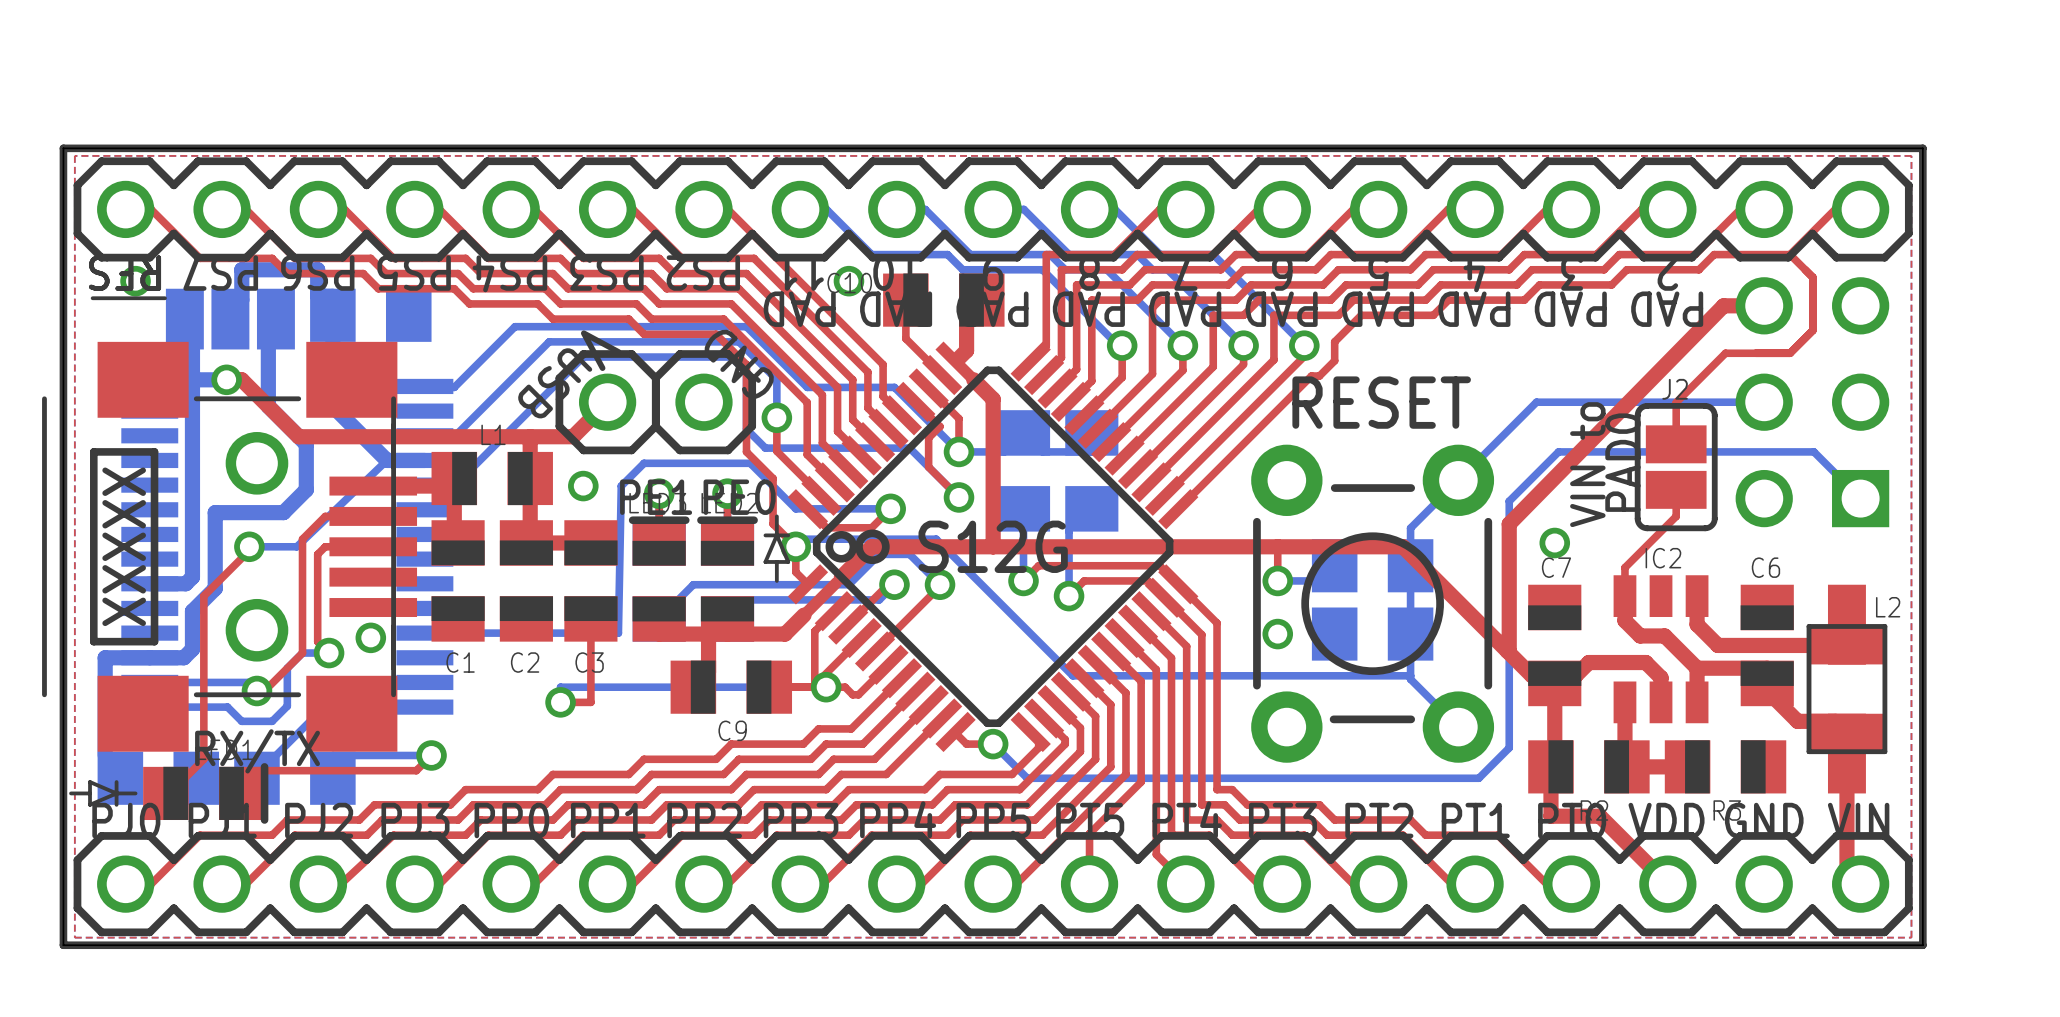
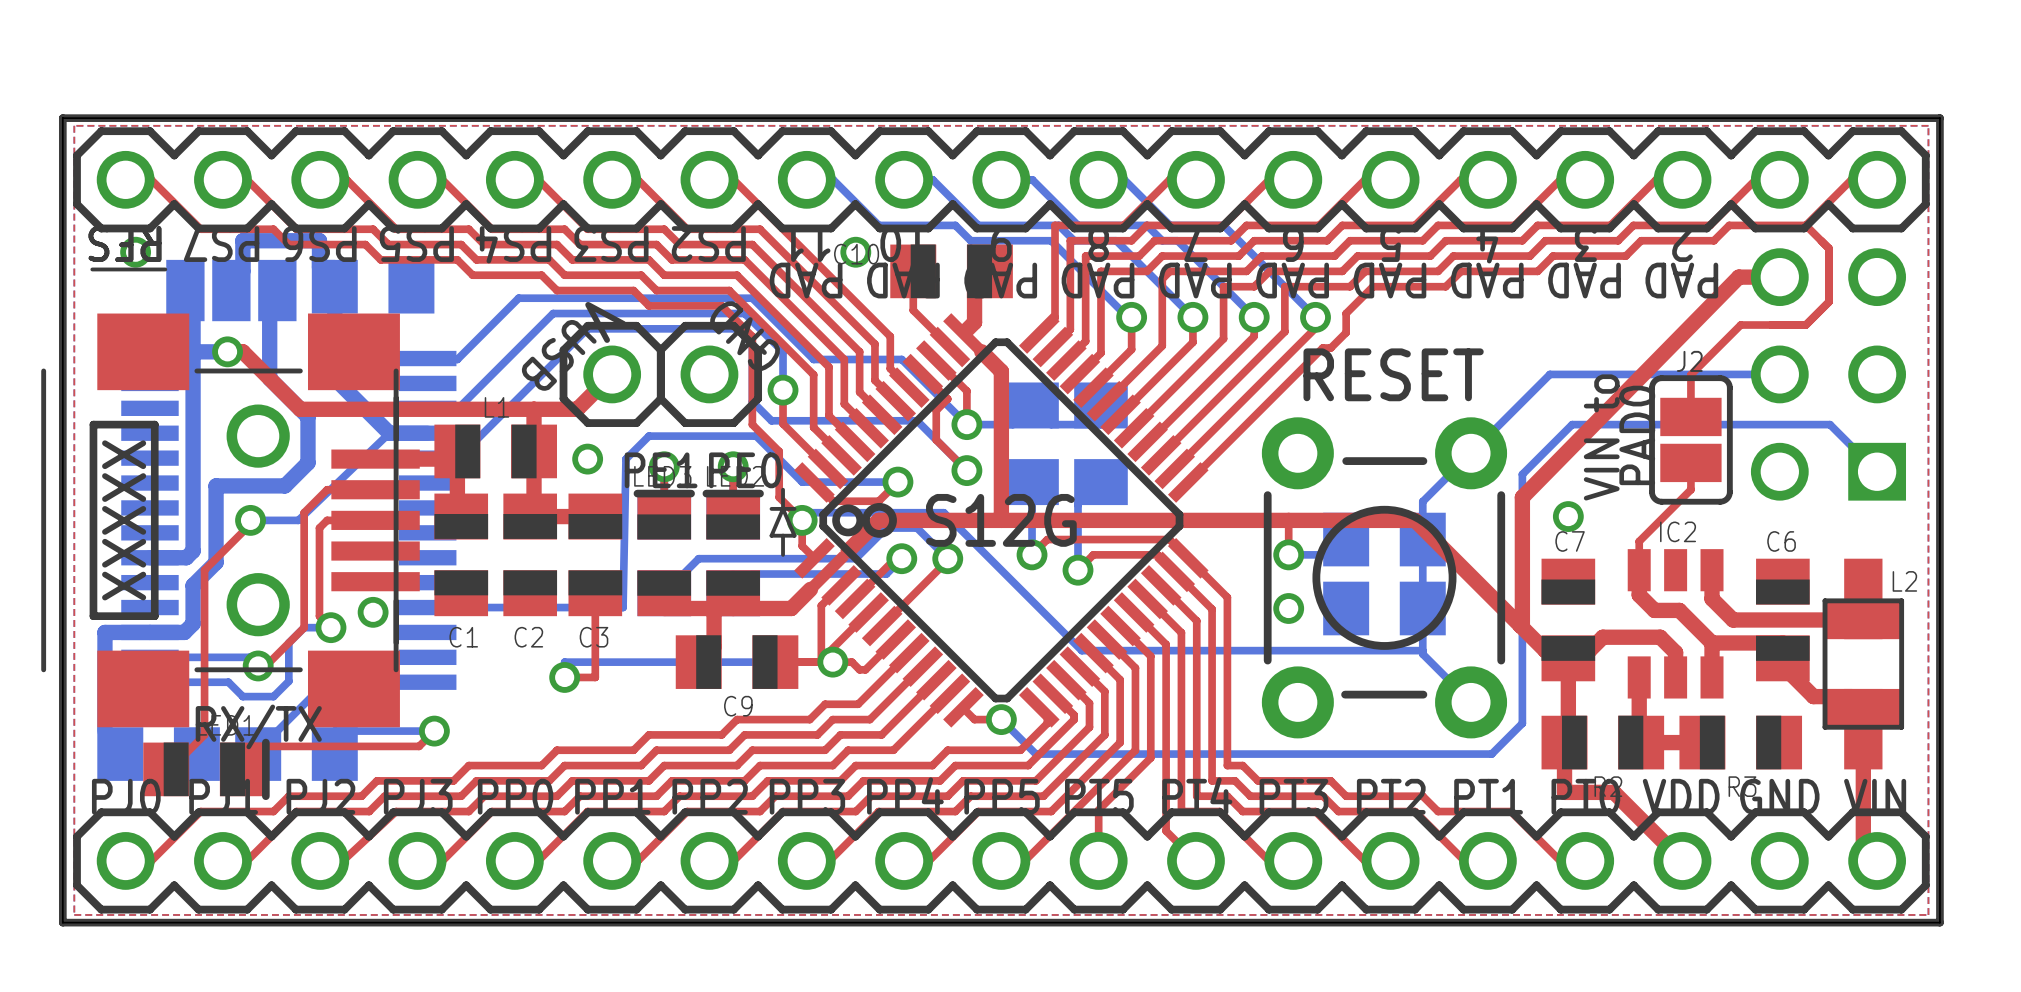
line: (116, 782) (116, 804) -> none
line: (71, 793) (90, 793) -> none
line: (116, 793) (90, 804) (90, 782) (116, 793) -> none
line: (116, 793) (135, 793) -> none

